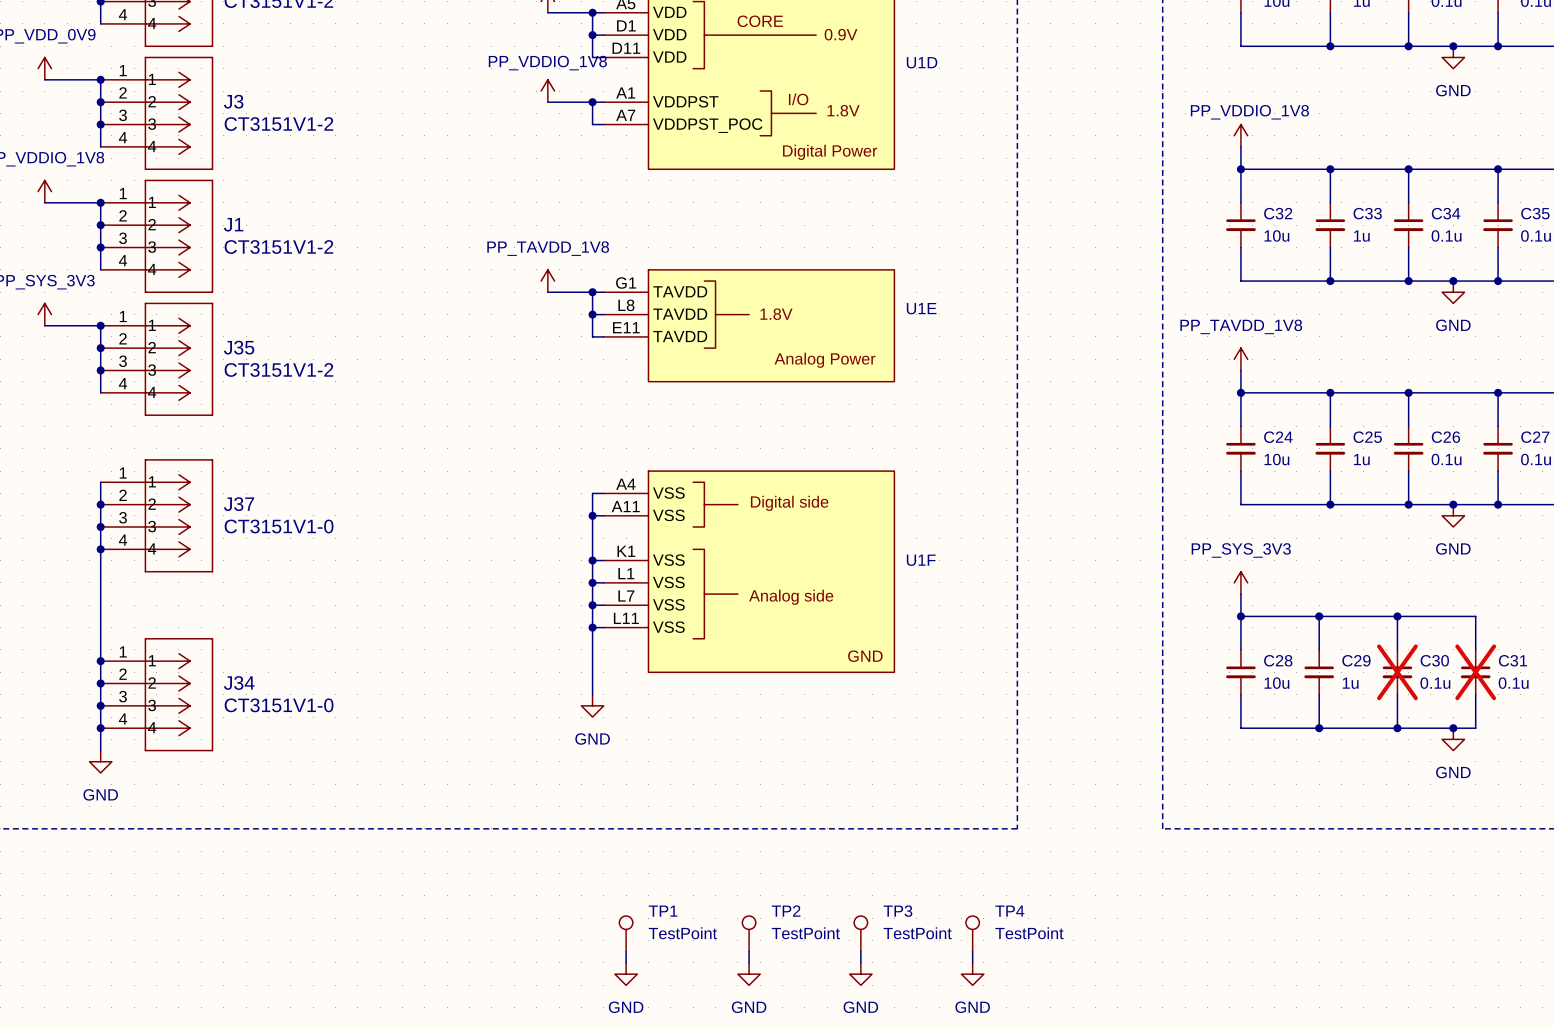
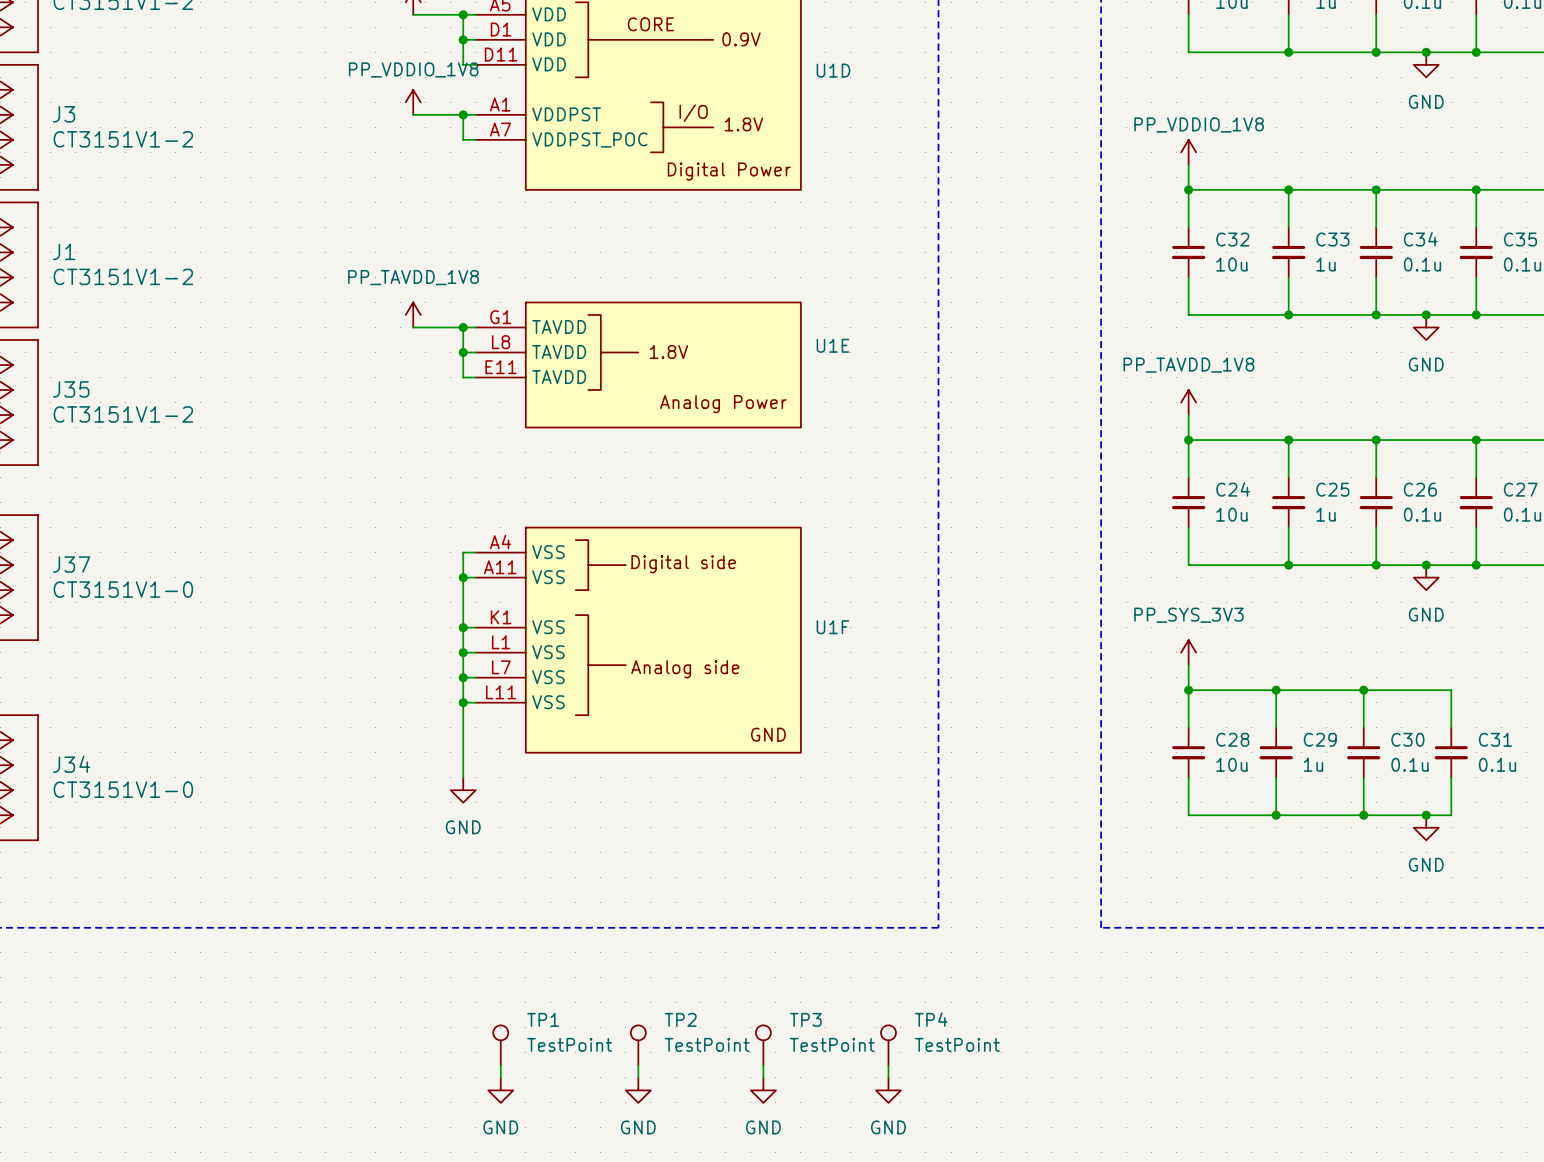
C30 do-not-place cross: (1397, 672) -> none
C31 do-not-place cross: (1475, 672) -> none

